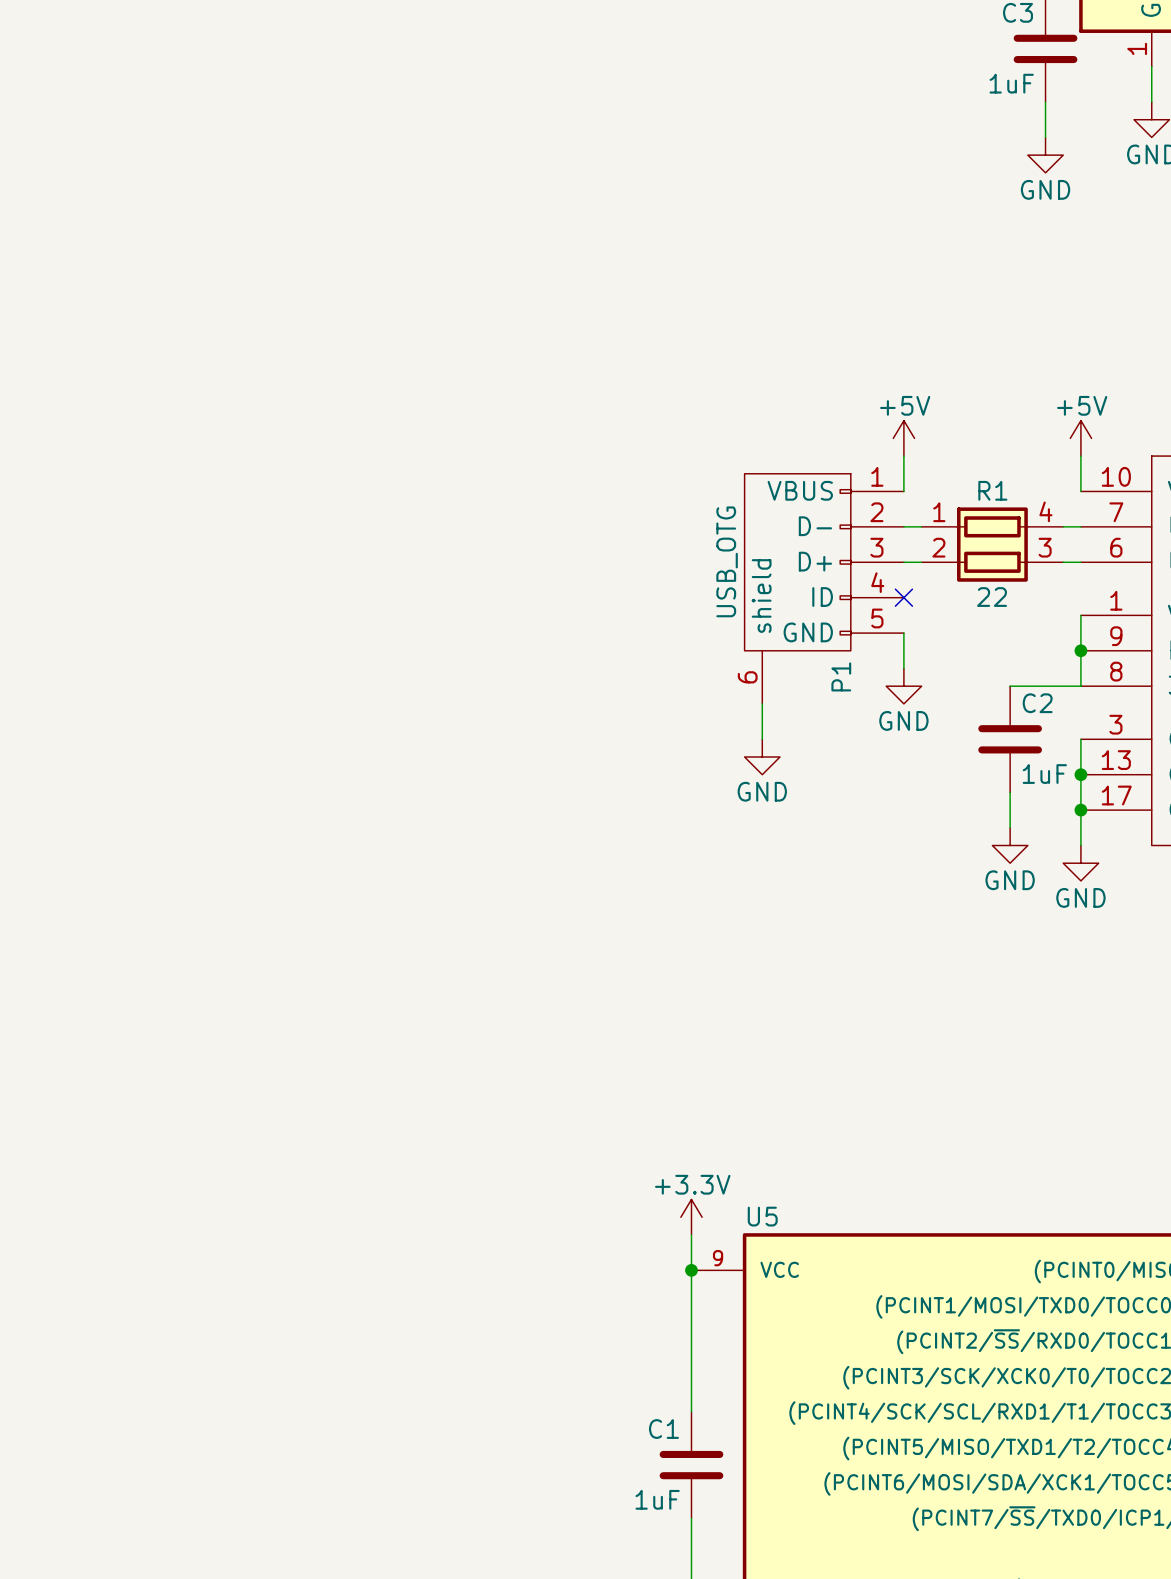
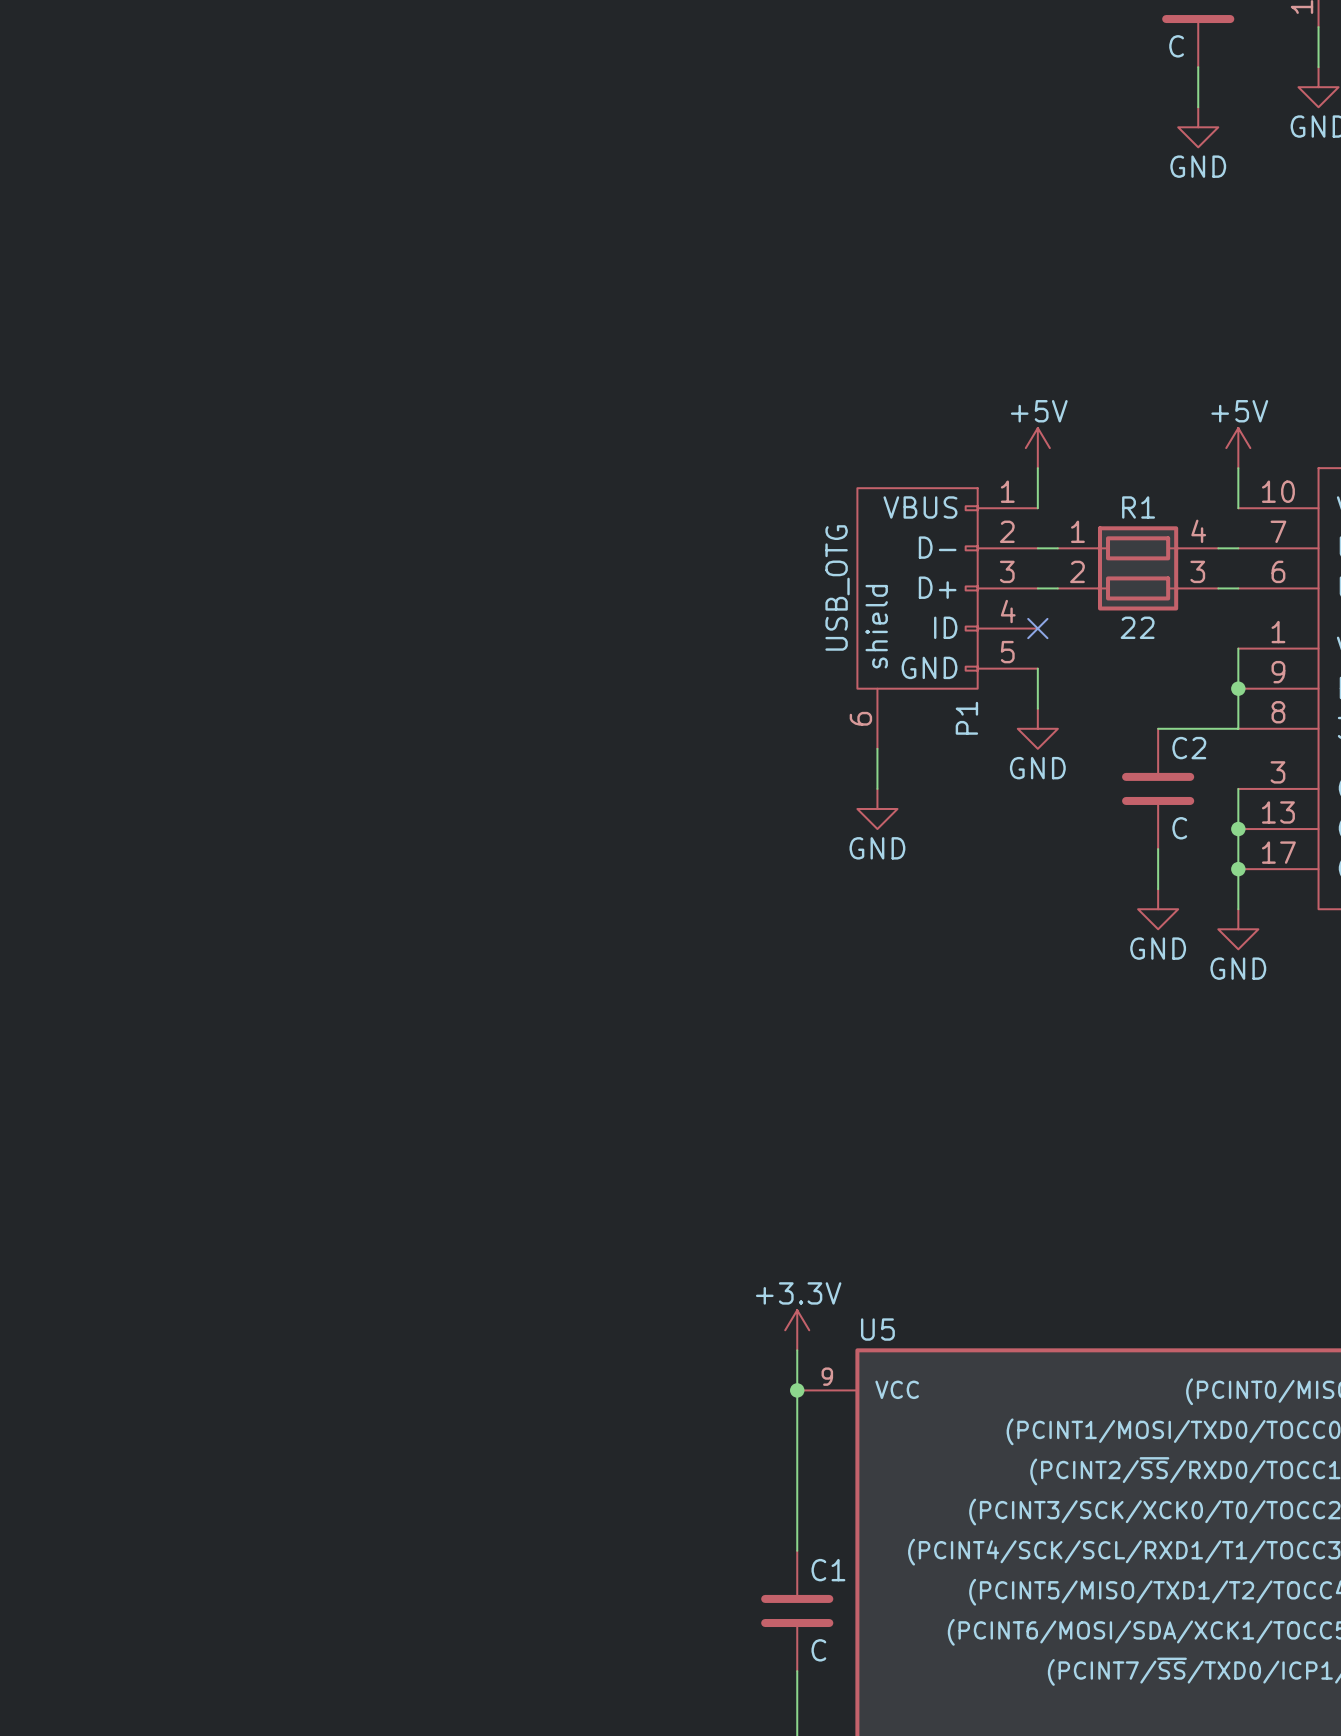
C3 value: 1uF (1011, 83) -> C (1176, 46)
C2 value: 1uF (1044, 774) -> C (1179, 828)
C1 name position: C1 (663, 1429) -> C1 (828, 1570)
C1 value: 1uF (657, 1499) -> C (818, 1650)

